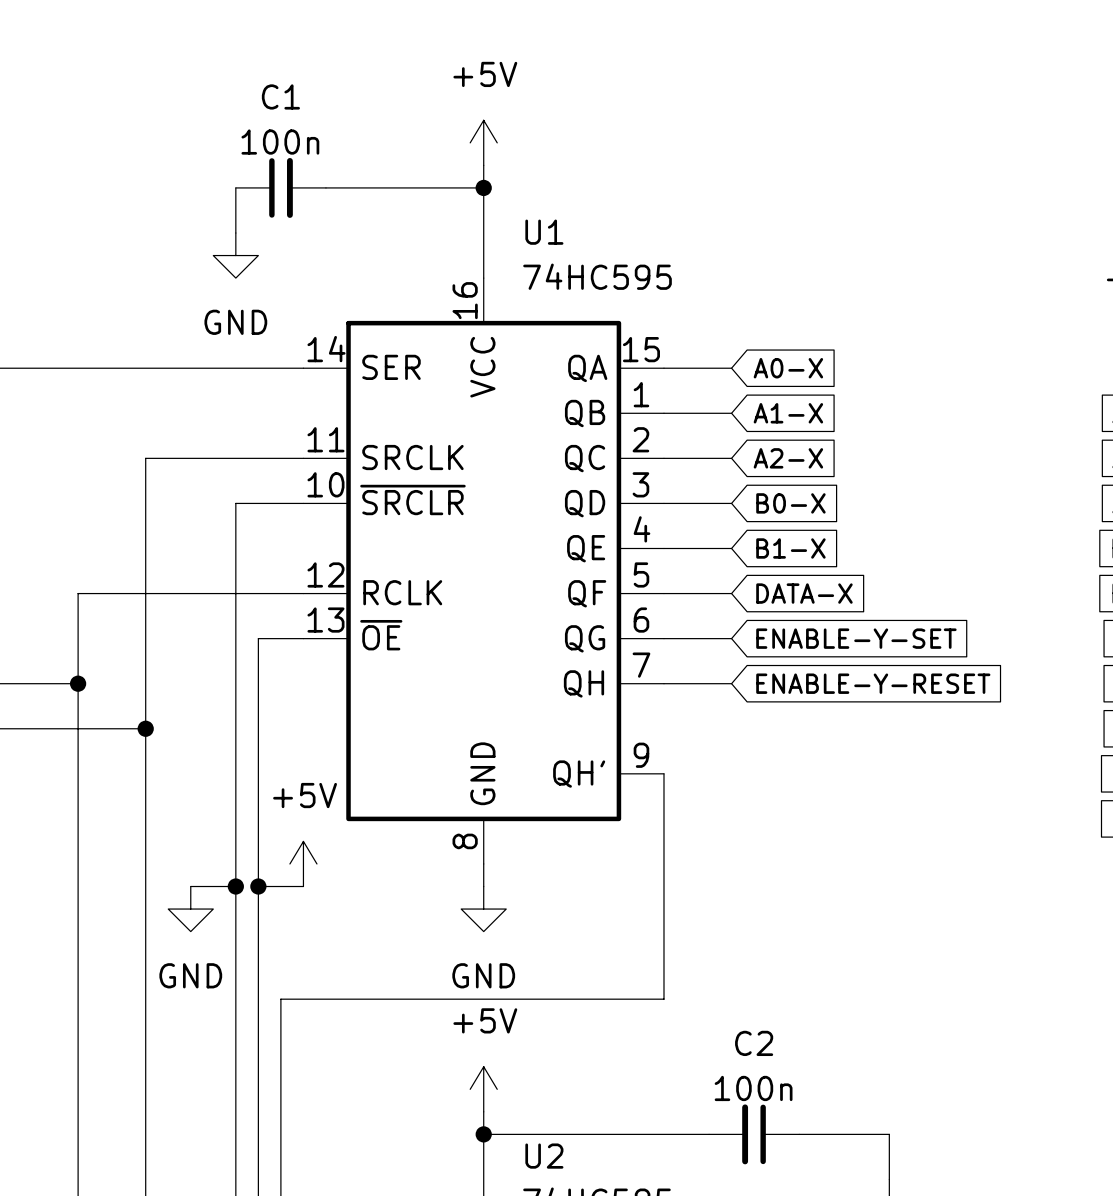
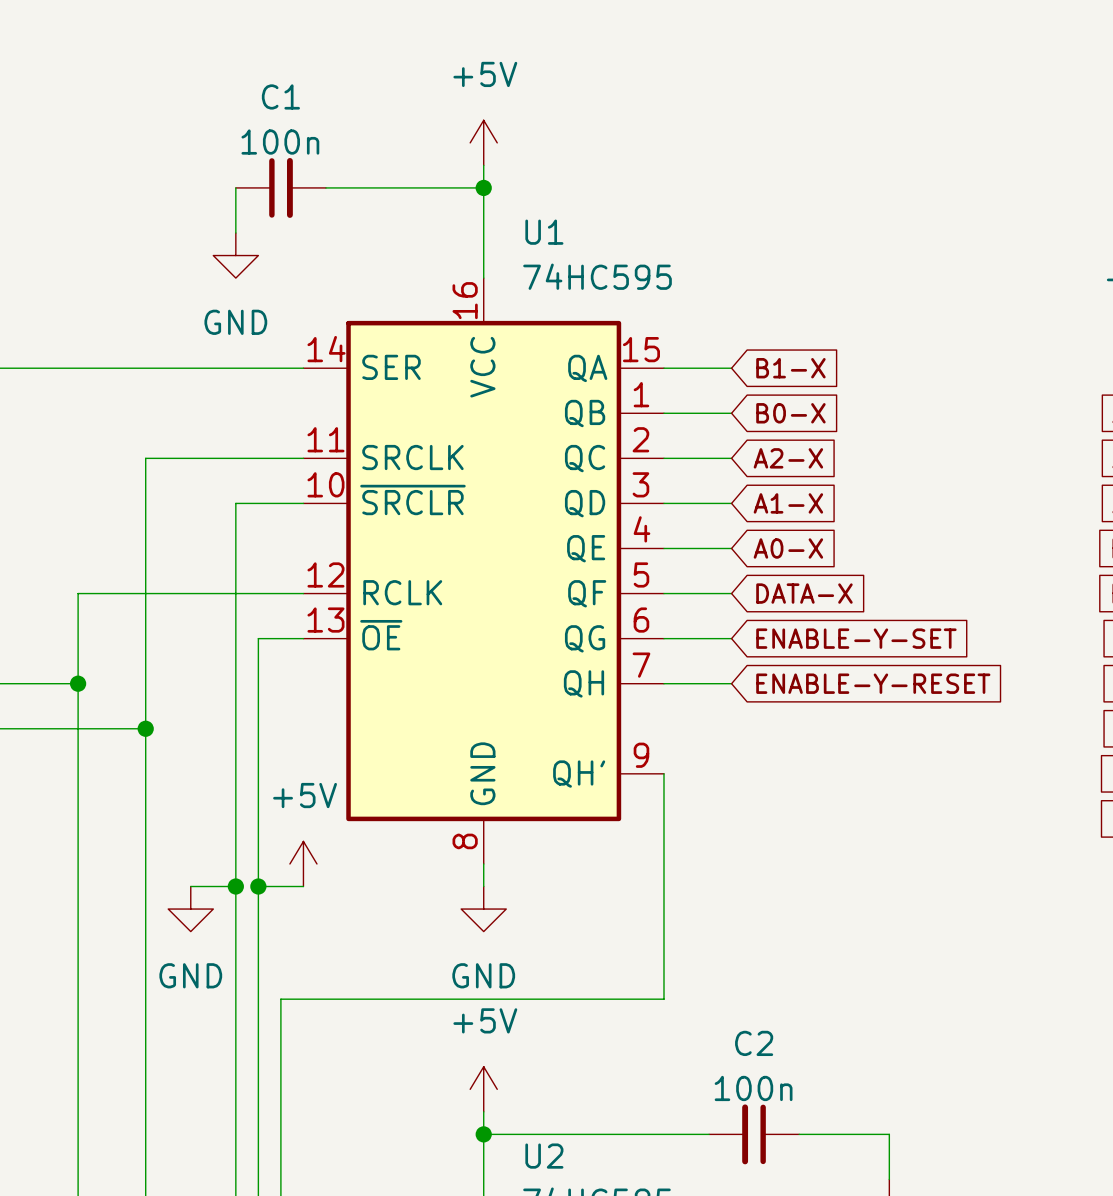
global label: A0-X (788, 368) -> B1-X (790, 368)
global label: A1-X (788, 413) -> B0-X (790, 413)
global label: B0-X (790, 503) -> A1-X (788, 503)
global label: B1-X (790, 548) -> A0-X (788, 548)

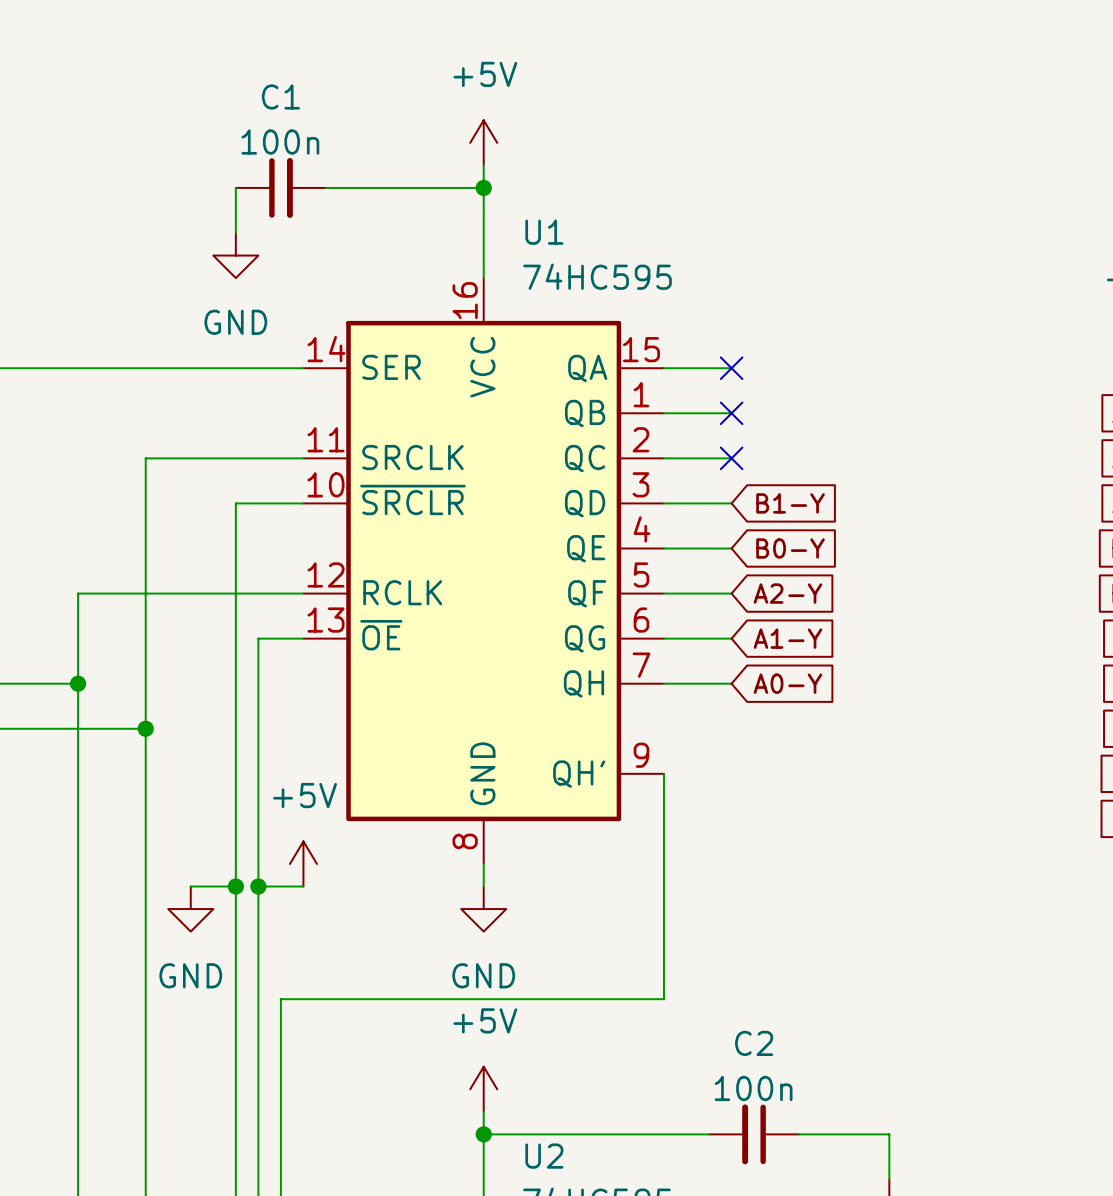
no-connect mark: none -> (731, 368)
global label: B1-X (790, 368) -> none
no-connect mark: none -> (731, 413)
global label: B0-X (790, 413) -> none
no-connect mark: none -> (731, 458)
global label: A2-X (788, 458) -> none
global label: A1-X (788, 503) -> B1-Y (790, 503)
global label: A0-X (788, 548) -> B0-Y (790, 548)
global label: DATA-X (804, 593) -> A2-Y (787, 593)
global label: ENABLE-Y-SET (856, 638) -> A1-Y (787, 638)
global label: ENABLE-Y-RESET (873, 683) -> A0-Y (787, 683)

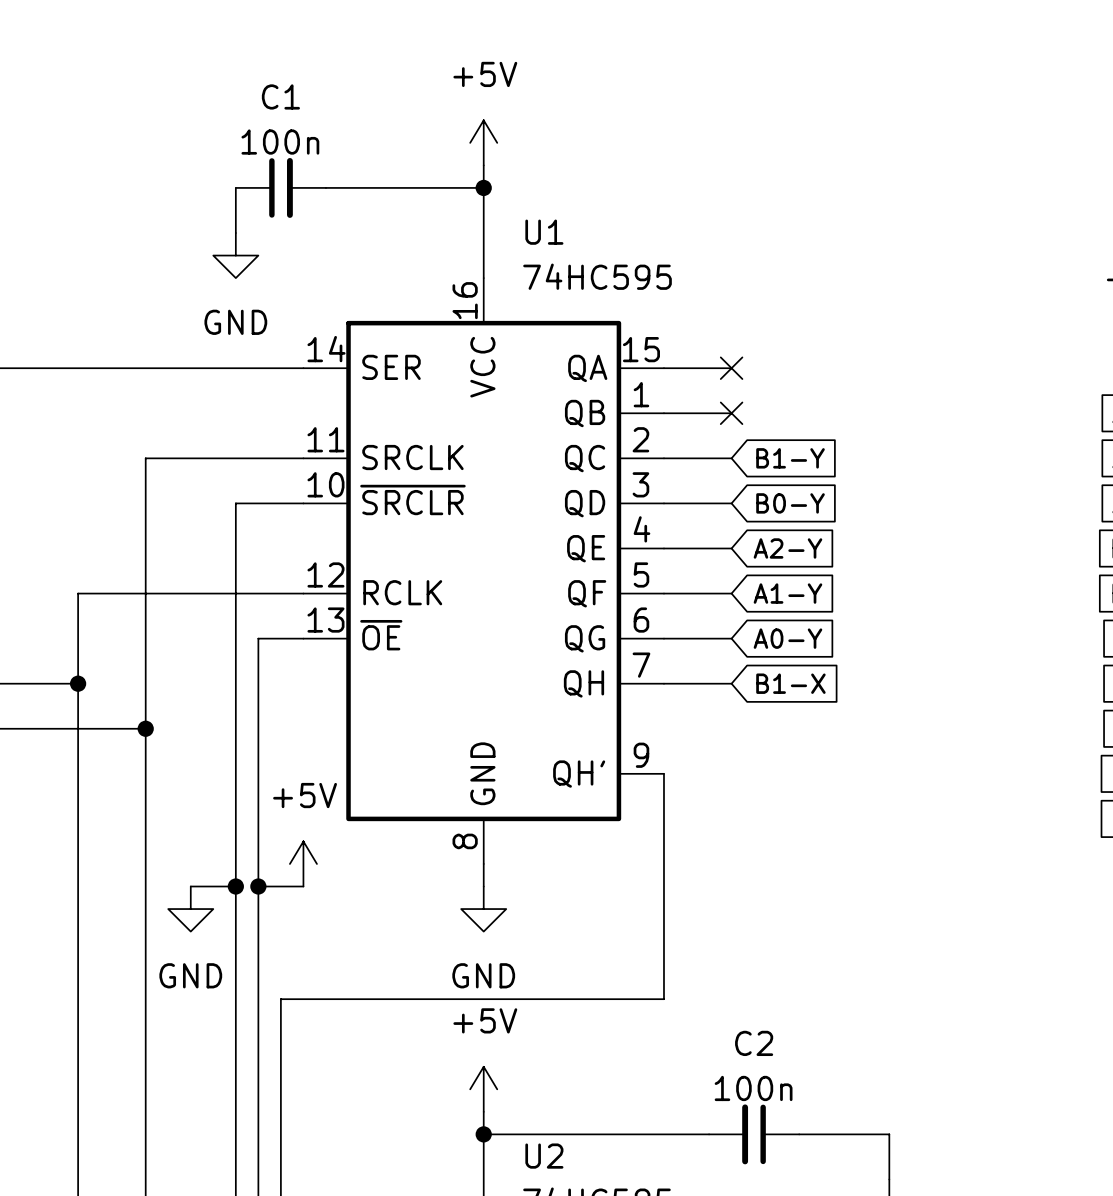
no-connect mark: (731, 458) -> none
global label: none -> B1-Y (790, 458)
global label: B1-Y (790, 503) -> B0-Y (790, 503)
global label: B0-Y (790, 548) -> A2-Y (787, 548)
global label: A2-Y (787, 593) -> A1-Y (787, 593)
global label: A1-Y (787, 638) -> A0-Y (787, 638)
global label: A0-Y (787, 683) -> B1-X (790, 683)

